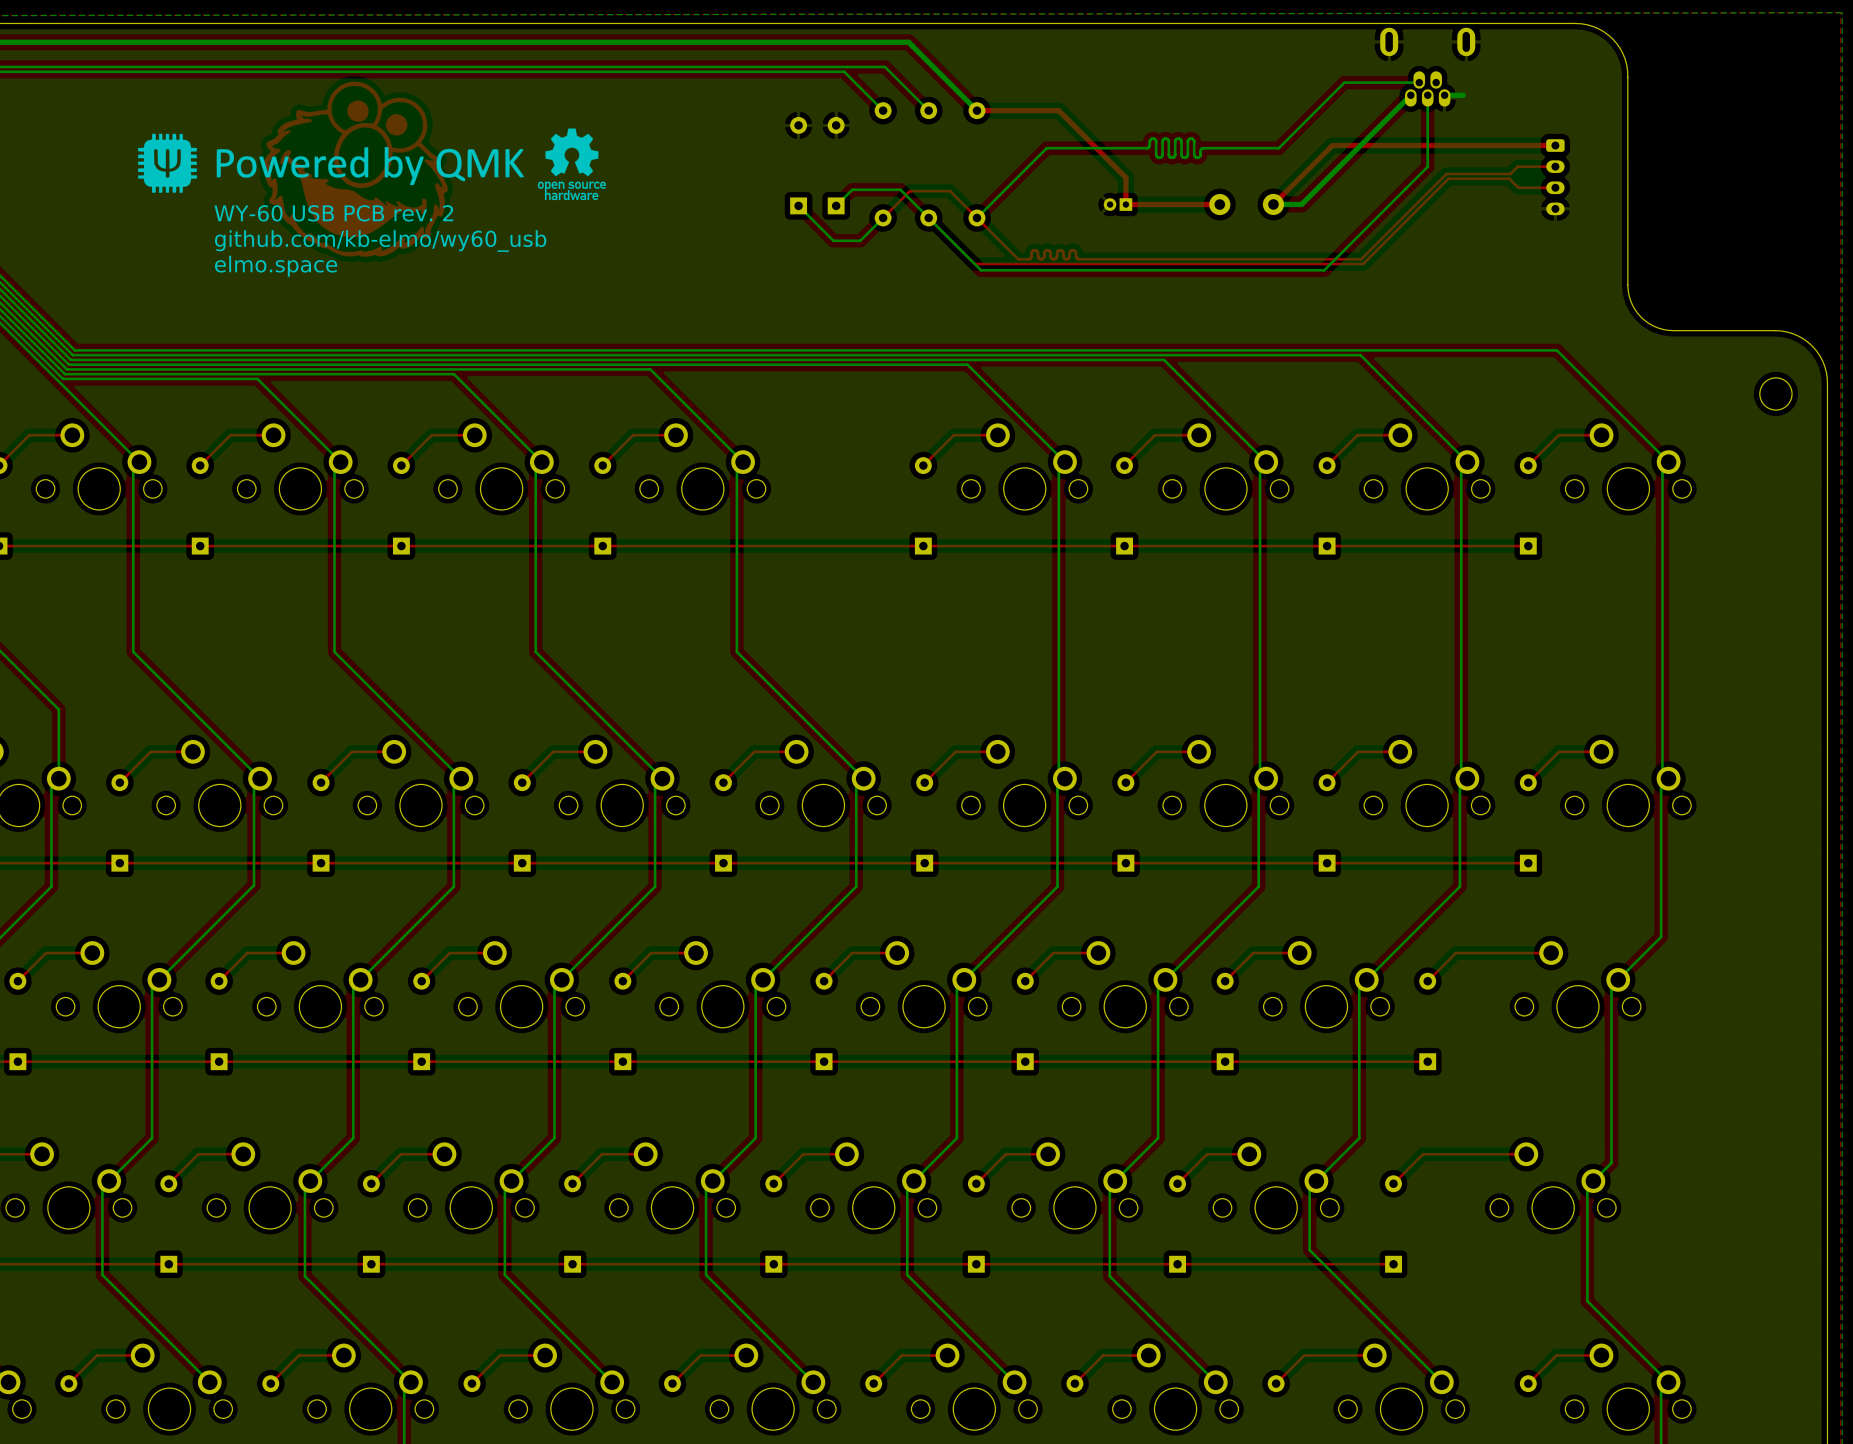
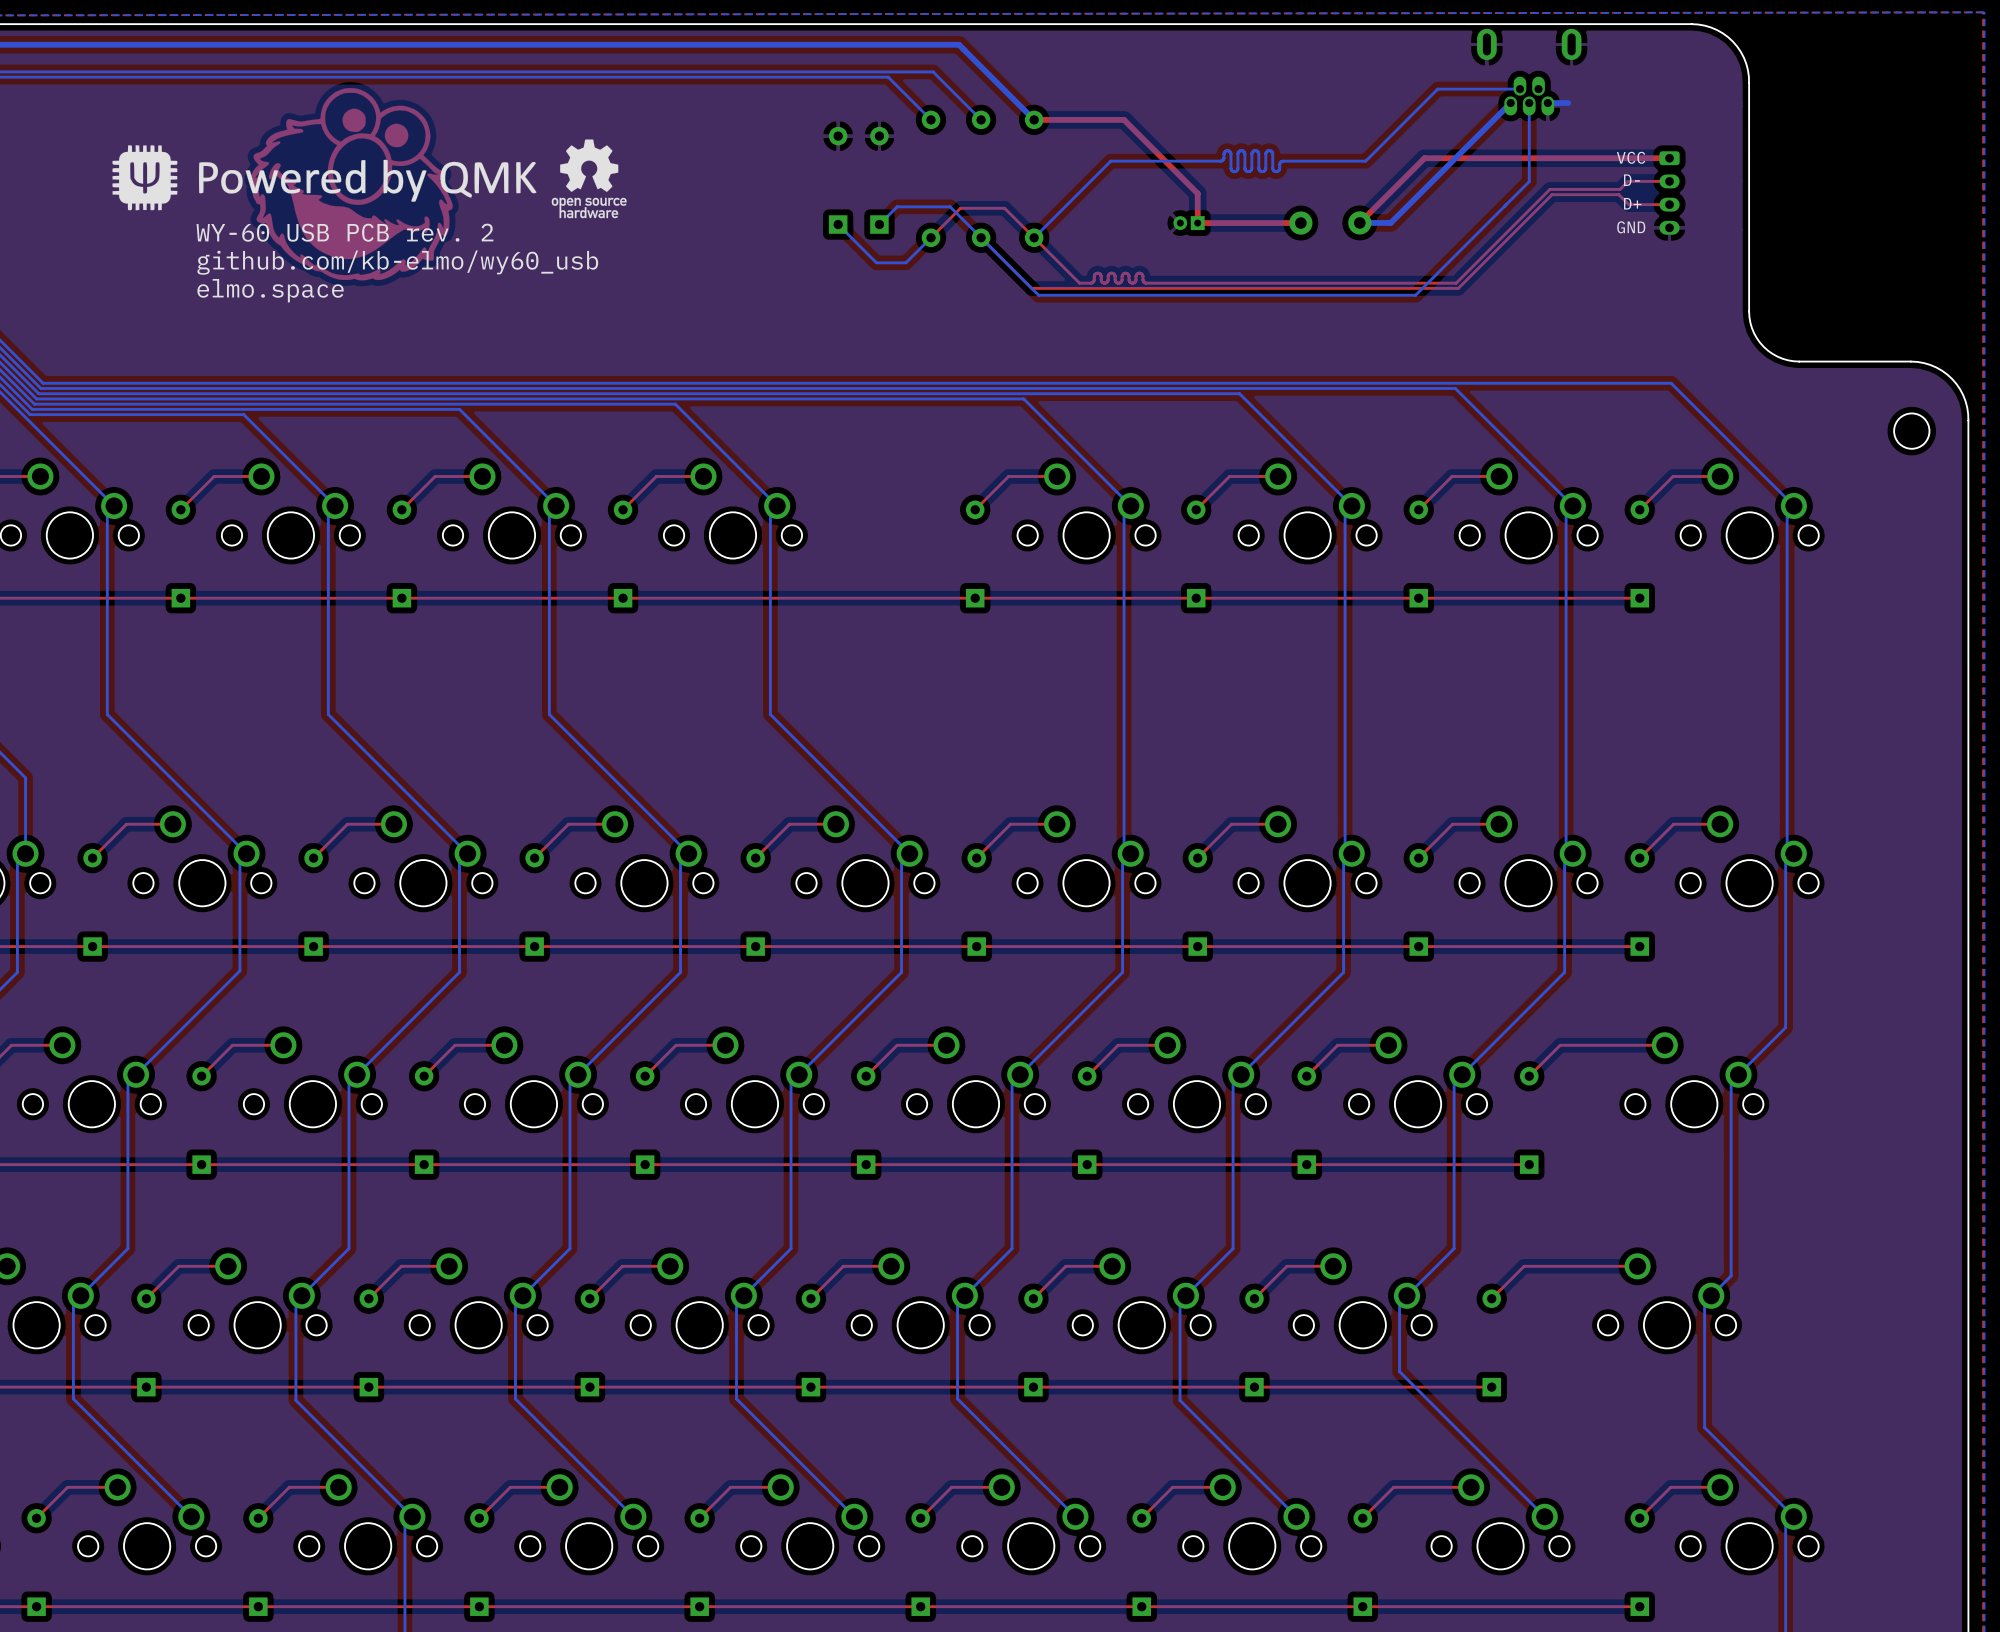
text: none -> VCC (1631, 157)
text: none -> D- (1631, 180)
text: none -> D+ (1632, 203)
text: none -> GND (1631, 227)

